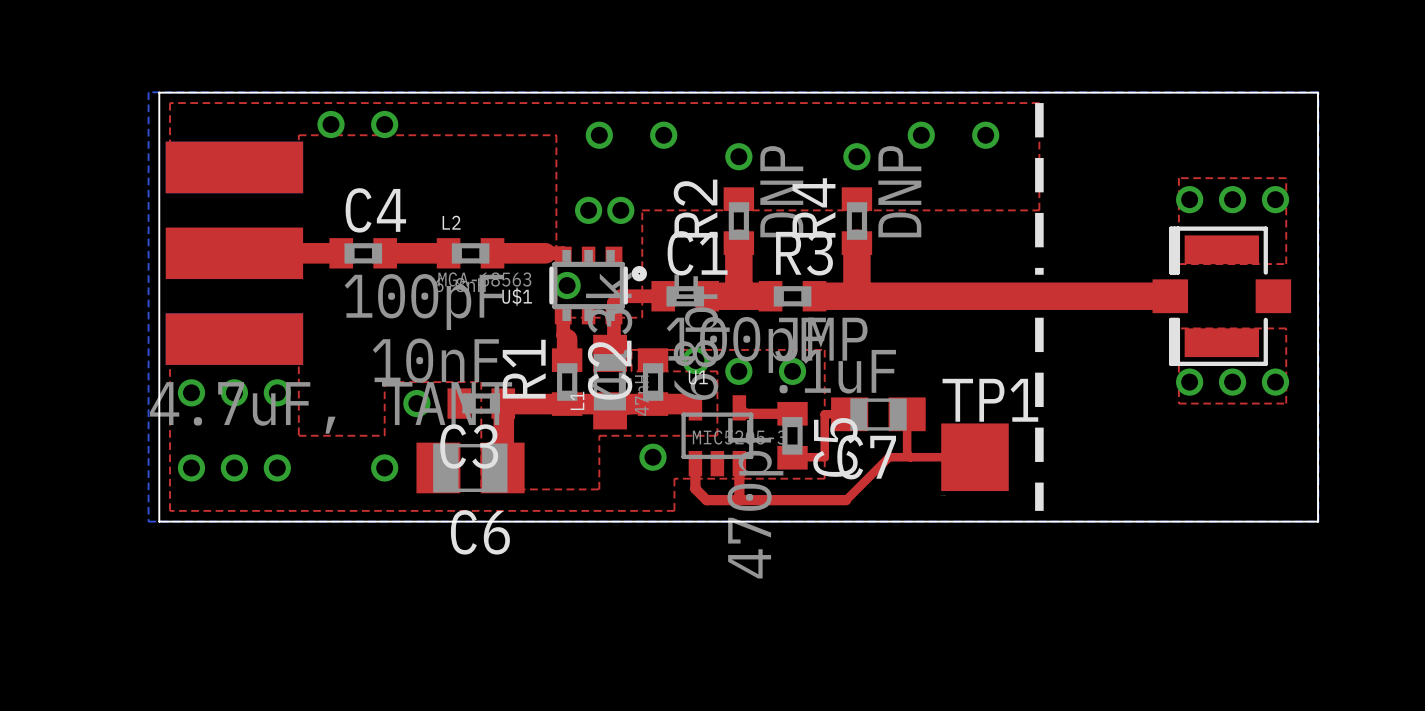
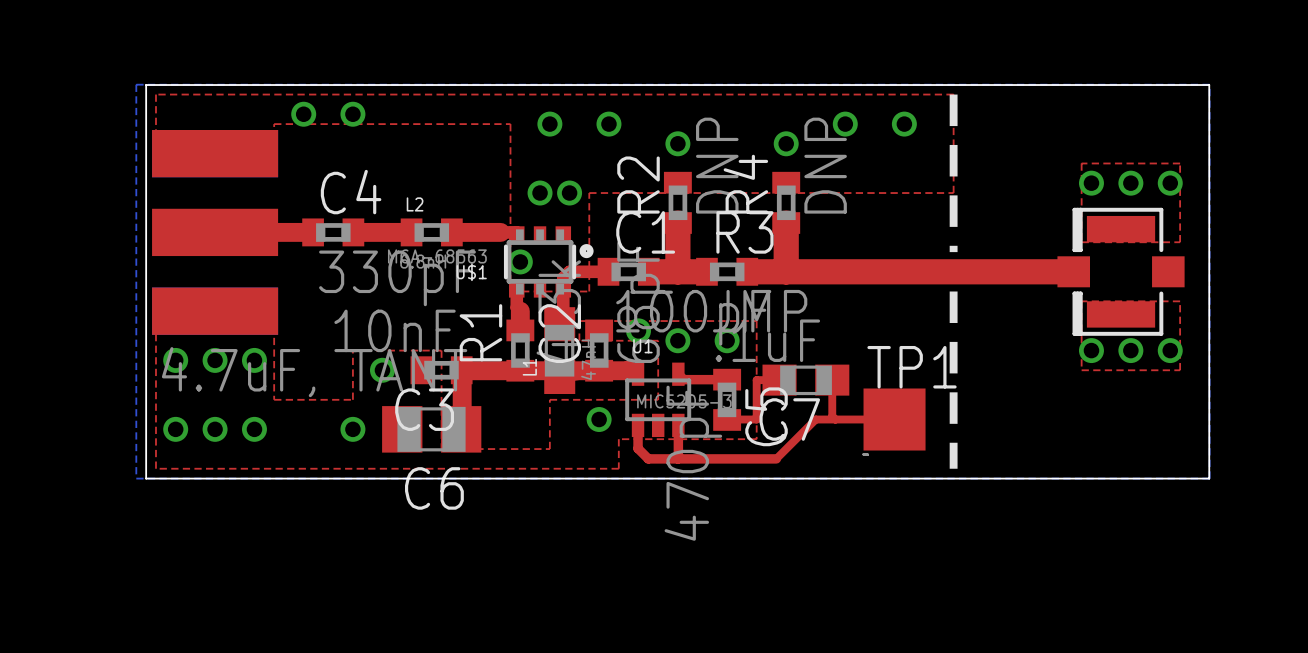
C4 value: 100pF (424, 302) -> 330pF (397, 278)

